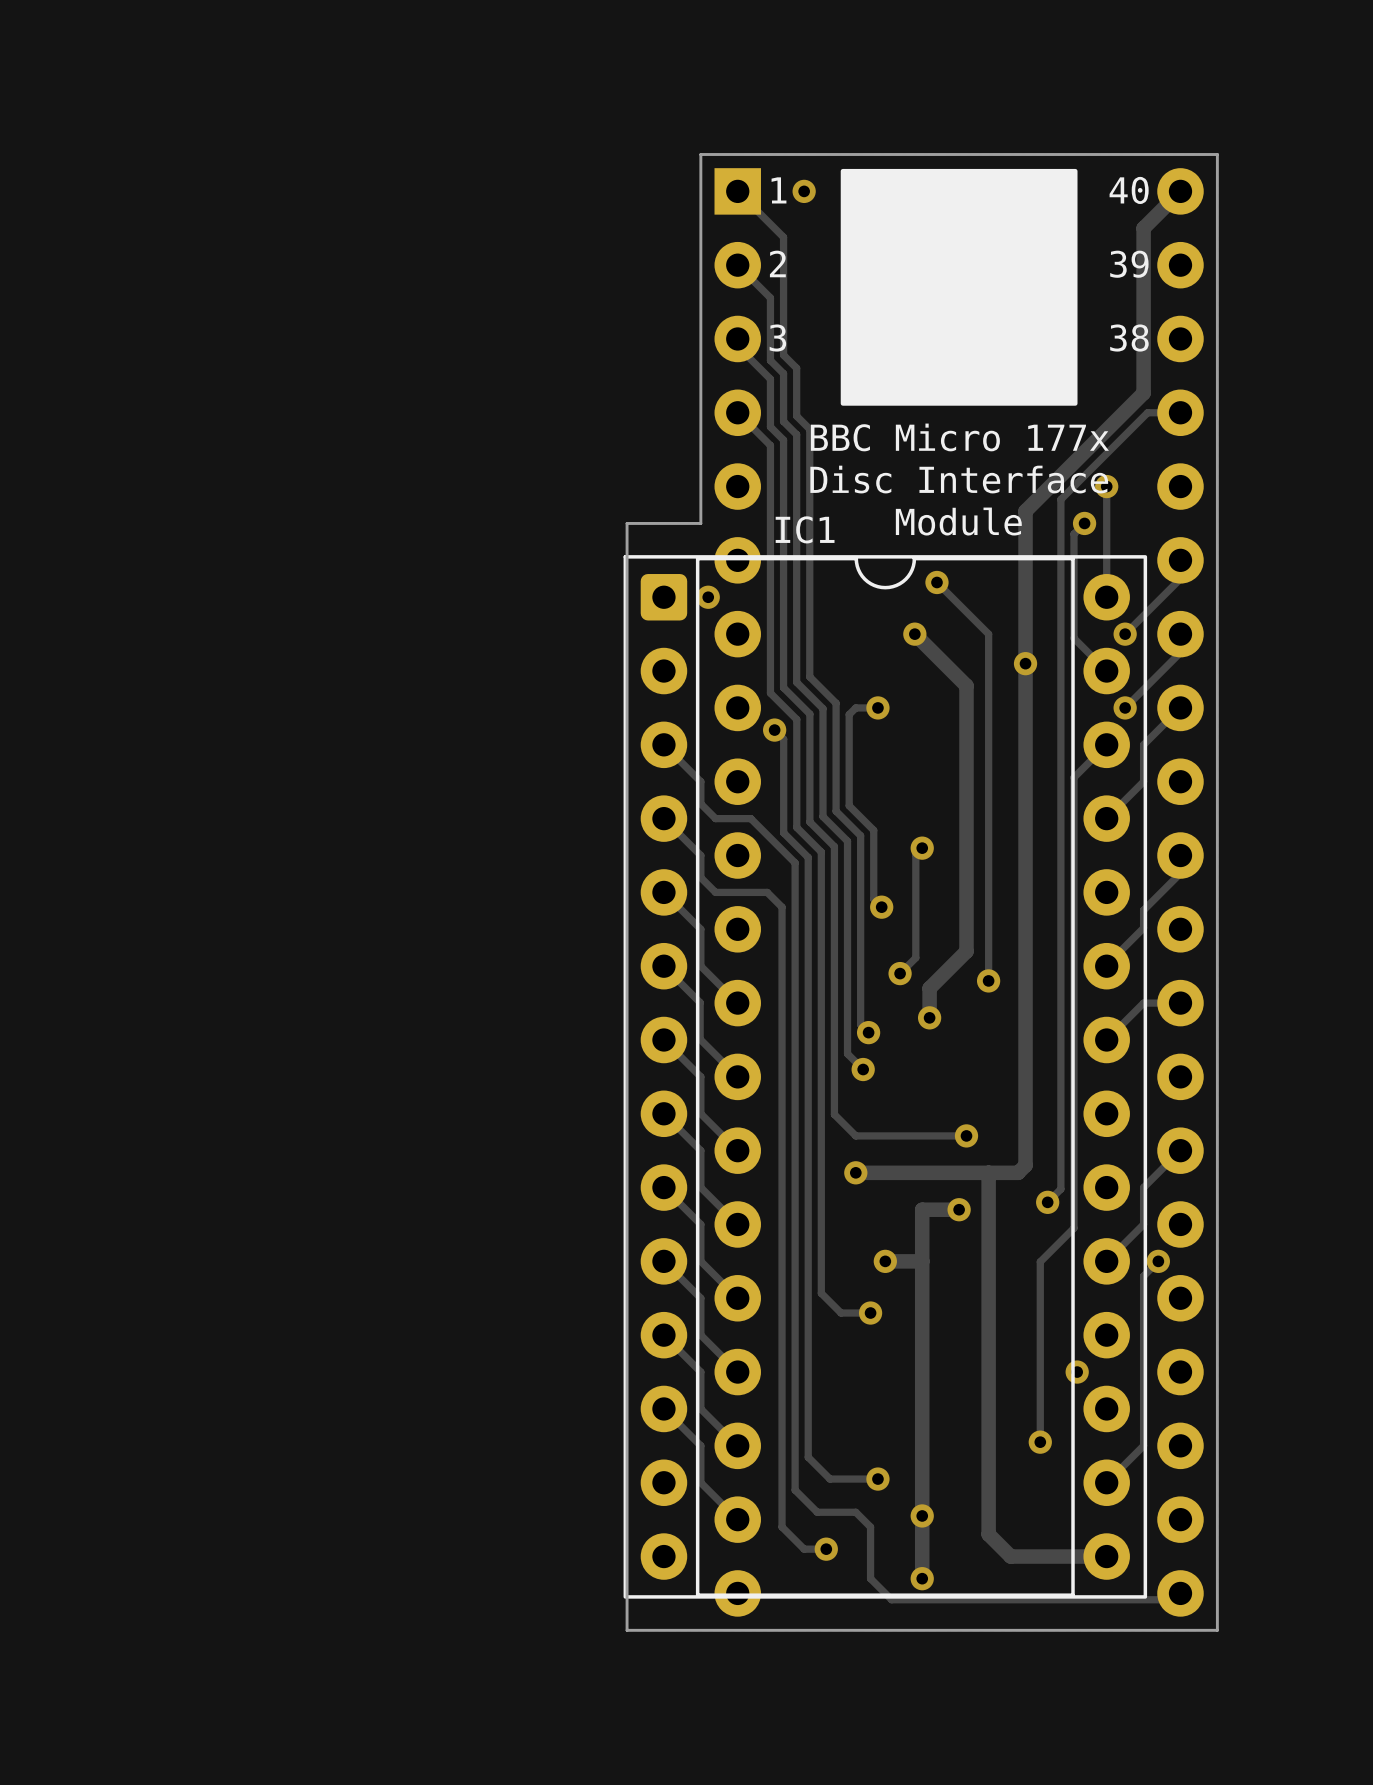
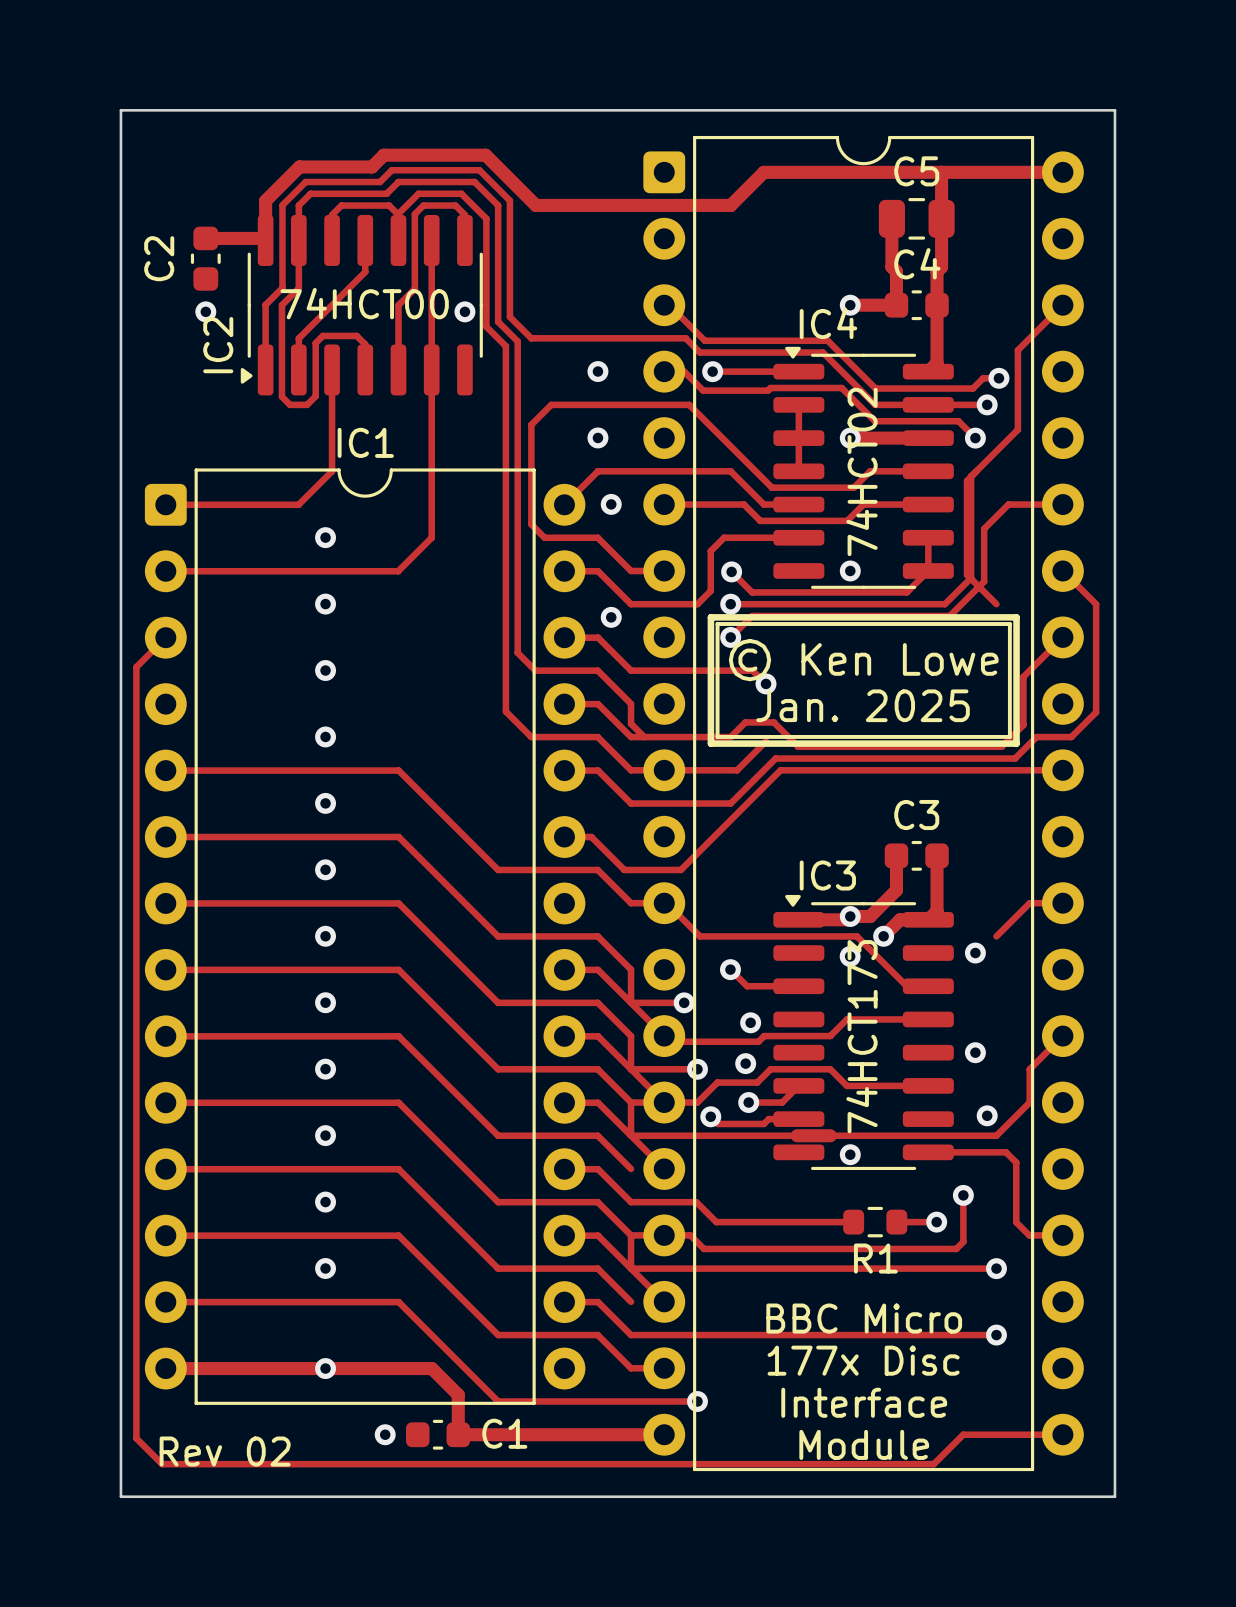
board edge: (700, 154) (700, 523) (627, 523) (627, 1630) (1217, 1630) (1217, 154) (700, 154) -> (120, 110) (120, 1496) (1114, 1496) (1114, 110) (120, 110)
drawing: [840, 168, 1078, 406] -> none
text: 1 (778, 190) -> none
text: 40 (1129, 190) -> none
track: (737, 191) (783, 237) (783, 355) (796, 368) (796, 416) (809, 429) -> none
via: (804, 191) -> none
track: none -> (941, 172) (941, 267) (937, 271) (937, 362) (928, 371)
track: (1180, 191) (1143, 228) (1143, 393) (1025, 511) (1025, 1165) (1018, 1172) (855, 1172) -> (1062, 172) (763, 172) (730, 205) (535, 205) (485, 155) (383, 155) (372, 166) (299, 166) (265, 200) (265, 240)
track: none -> (398, 214) (389, 205) (341, 205) (332, 214) (332, 240)
track: none -> (891, 218) (891, 267) (896, 271) (896, 305) (850, 305)
C5: none -> (916, 218)
text: 2 (777, 263) -> none
track: none -> (205, 238) (263, 238)
text: 39 (1129, 264) -> none
track: (737, 265) (770, 297) (770, 360) (783, 373) (783, 421) (796, 434) (796, 682) (822, 708) (822, 816) (847, 841) (847, 1053) (863, 1069) -> none
track: none -> (365, 240) (365, 271) (298, 338) (298, 369)
track: none -> (398, 240) (398, 213) (418, 193) (461, 193) (486, 218) (486, 326) (505, 346) (505, 711) (531, 737) (597, 737)
track: none -> (431, 240) (431, 537) (398, 571) (165, 571)
track: none -> (464, 240) (464, 214) (455, 205) (423, 205) (414, 214) (414, 288) (398, 305) (398, 369)
C2: none -> (205, 258)
IC2: none -> 74HCT00 (361, 305)
track: none -> (669, 305) (704, 340) (827, 340) (875, 388) (972, 388) (983, 378) (998, 378)
text: 3 (777, 338) -> none
via: none -> (850, 305)
C4: none -> (916, 305)
text: 38 (1129, 338) -> none
track: none -> (1062, 305) (1017, 350) (1017, 429) (971, 476) (971, 578) (944, 604) (730, 604)
via: none -> (205, 311)
via: none -> (464, 311)
track: (737, 346) (770, 379) (770, 426) (783, 440) (783, 687) (809, 714) (809, 822) (834, 846) (834, 1114) (855, 1135) (966, 1135) -> none
track: none -> (265, 369) (265, 304) (282, 288) (282, 205) (305, 182) (380, 182) (391, 170) (479, 170) (509, 200) (509, 316) (531, 338) (685, 338) (699, 352) (822, 352) (875, 404) (987, 404)
track: none -> (332, 369) (332, 471) (298, 504) (165, 504)
track: none -> (365, 369) (365, 344) (356, 335) (322, 335) (315, 343) (315, 396) (307, 404) (290, 404) (281, 396) (281, 305) (298, 288) (298, 205) (310, 193) (386, 193) (398, 182) (474, 182) (498, 205) (498, 321) (517, 341) (517, 652) (535, 670) (597, 670)
via: none -> (597, 371)
track: (737, 412) (770, 445) (770, 693) (796, 719) (796, 827) (821, 852) (821, 1293) (841, 1313) (870, 1313) -> (664, 371) (684, 371) (703, 390) (841, 388) (874, 421) (958, 421) (975, 438)
track: none -> (712, 371) (798, 371)
via: none -> (712, 371)
track: (1180, 412) (1147, 412) (1060, 499) (1060, 1189) (1047, 1202) -> none
via: none -> (998, 378)
track: (809, 429) (809, 676) (836, 703) (836, 811) (860, 835) (860, 1024) (868, 1032) -> none
text: BBC Micro 177x (959, 437) -> none
track: none -> (798, 404) (798, 471)
via: none -> (987, 404)
text: Disc Interface (959, 479) -> none
via: none -> (597, 437)
track: none -> (850, 438) (928, 438)
via: none -> (850, 438)
via: none -> (975, 438)
track: (1106, 486) (1106, 597) -> none
via: (1106, 486) -> none
IC4: none -> 74HCT02 (863, 467)
text: Module (958, 521) -> none
track: none -> (928, 471) (870, 471) (853, 487) (772, 487) (689, 404) (551, 404) (531, 424) (531, 524) (544, 537) (597, 537) (631, 570) (664, 570)
via: (1084, 523) -> none
IC1 name position: IC1 (805, 529) -> IC1 (365, 442)
IC1 footprint: [623, 555, 1148, 1599] -> [144, 468, 586, 1405]
via: none -> (611, 504)
track: none -> (664, 504) (743, 504) (760, 520) (847, 520) (863, 504) (928, 504)
track: none -> (798, 504) (763, 504) (730, 471) (597, 471) (564, 504)
track: none -> (1062, 504) (1008, 504) (984, 528) (984, 581) (949, 615) (752, 615) (730, 637)
track: (1180, 578) (1125, 634) -> none
track: (936, 582) (988, 634) (988, 988) -> none
via: (936, 582) -> none
via: none -> (325, 537)
via: (708, 597) -> none
track: none -> (798, 537) (724, 537) (710, 551) (710, 590) (697, 604) (631, 604) (598, 571) (564, 571)
track: none -> (928, 537) (928, 570) (906, 592) (752, 592) (731, 571)
track: (914, 634) (966, 685) (966, 951) (929, 988) (929, 1017) -> none
via: (914, 634) -> none
via: none -> (850, 570)
via: (1125, 634) -> none
via: none -> (731, 571)
track: (1180, 652) (1125, 707) -> none
via: (1025, 663) -> none
via: none -> (325, 604)
via: none -> (730, 604)
via: none -> (611, 617)
line: none -> (710, 617) (1016, 617) (1016, 743) (710, 743) (710, 617)
line: none -> (717, 624) (1009, 624) (1009, 736) (717, 736) (717, 624)
via: none -> (730, 637)
track: (877, 707) (855, 707) (849, 714) (849, 805) (873, 830) (873, 899) (881, 907) -> none
via: (877, 707) -> none
via: (1125, 707) -> none
track: none -> (165, 637) (136, 667) (136, 1438) (162, 1464) (933, 1464) (963, 1434) (1062, 1434)
track: none -> (564, 637) (598, 637) (631, 670) (752, 670) (766, 683)
track: (774, 730) (783, 739) (783, 832) (808, 857) (808, 1457) (829, 1479) (877, 1479) -> none
via: (774, 730) -> none
text: none -> © Ken Lowe (863, 660)
via: none -> (325, 670)
track: (1106, 744) (1073, 777) (1073, 1228) (1040, 1261) (1040, 1442) -> none
track: (1143, 744) (1143, 781) (1106, 818) -> (1029, 670) (1023, 676) (1023, 725) (1001, 746) (798, 746) (773, 722) (745, 722) (730, 737) (676, 737)
via: none -> (766, 683)
track: none -> (564, 704) (598, 704) (631, 737) (644, 737)
text: none -> Jan. 2025 (863, 705)
via: none -> (325, 736)
track: (750, 818) (795, 862) (795, 1490) (817, 1512) (855, 1512) (870, 1527) (870, 1578) (891, 1599) (1174, 1599) -> none
track: none -> (766, 741) (737, 770) (631, 770)
track: (922, 848) (915, 854) (915, 957) (900, 973) -> none
via: (922, 848) -> none
track: (700, 855) (700, 877) (715, 892) -> (564, 770) (598, 770) (631, 803) (644, 803)
track: none -> (1062, 770) (780, 770) (680, 869) (624, 869) (591, 837) (564, 837)
track: (1180, 873) (1143, 910) (1143, 928) (1105, 965) -> none
via: none -> (325, 803)
track: (663, 892) (700, 929) (700, 966) (737, 1003) -> (165, 770) (398, 770) (498, 869) (597, 869) (631, 903) (664, 903)
part: (737, 892) -> none
track: (767, 892) (782, 907) (782, 1527) (804, 1549) (826, 1549) -> (690, 803) (730, 803) (775, 758) (1015, 758) (1036, 737) (1071, 737) (1096, 712) (1096, 604) (1062, 570)
part: none -> (863, 803)
part: (1180, 892) -> none
via: (881, 907) -> none
track: none -> (165, 837) (398, 837) (498, 936) (597, 936)
track: none -> (896, 855) (896, 890) (870, 916) (850, 916) (846, 919) (798, 919)
C3: none -> (916, 855)
track: none -> (937, 855) (937, 911) (928, 919) (900, 919) (883, 936)
track: (663, 965) (700, 1002) (700, 1039) (737, 1076) -> none
via: none -> (325, 869)
via: (900, 973) -> none
via: (988, 980) -> none
track: none -> (165, 903) (398, 903) (498, 1002) (597, 1002)
track: none -> (666, 903) (700, 936) (856, 936) (906, 986)
via position: (929, 1017) -> (850, 916)
via: (868, 1032) -> none
via: none -> (325, 936)
via: none -> (883, 936)
via: none -> (975, 953)
via: none -> (850, 956)
via: (863, 1069) -> none
track: none -> (730, 969) (747, 986) (798, 986)
via: none -> (730, 969)
track: none -> (165, 969) (398, 969) (498, 1069) (597, 1069)
track: none -> (564, 969) (598, 969) (631, 1002) (684, 1002)
via: none -> (325, 1002)
via: none -> (684, 1002)
track: none -> (928, 1019) (846, 1019) (830, 1036) (764, 1036) (758, 1041) (669, 1041)
via: none -> (750, 1022)
via: (966, 1135) -> none
IC3: none -> 74HCT173 (863, 1032)
track: none -> (165, 1036) (398, 1036) (498, 1135) (597, 1135)
track: none -> (564, 1036) (598, 1036) (631, 1069) (697, 1069)
via: none -> (975, 1052)
via: (855, 1172) -> none
track: (988, 1172) (988, 1534) (1010, 1556) (1106, 1556) -> none
via: none -> (745, 1063)
via: none -> (325, 1069)
via: none -> (697, 1069)
via: (1047, 1202) -> none
track: none -> (798, 1085) (782, 1102) (748, 1102)
track: none -> (928, 1085) (846, 1085) (830, 1069) (770, 1069) (757, 1082) (717, 1082) (697, 1102) (631, 1102)
track: (959, 1209) (922, 1209) (922, 1578) -> none
via: (959, 1209) -> none
track: none -> (165, 1102) (398, 1102) (498, 1202) (597, 1202)
track: none -> (564, 1102) (598, 1102) (631, 1135) (797, 1135)
via: none -> (748, 1102)
via: none -> (987, 1115)
track: none -> (710, 1116) (717, 1123) (763, 1123) (768, 1119) (798, 1119)
via: none -> (710, 1116)
via: none -> (325, 1135)
via: (885, 1261) -> none
track: none -> (830, 1135) (996, 1135)
track: (1158, 1261) (1143, 1276) (1143, 1445) (1106, 1482) -> (564, 1302) (598, 1302) (631, 1335) (996, 1335)
via: (1158, 1261) -> none
track: none -> (928, 1152) (1006, 1152) (1016, 1162) (1016, 1222) (1029, 1235) (1062, 1235)
via: none -> (850, 1154)
track: none -> (165, 1169) (398, 1169) (498, 1268) (597, 1268)
track: none -> (564, 1169) (598, 1169) (631, 1202) (696, 1202) (716, 1222) (853, 1222)
track: (700, 1298) (700, 1335) (737, 1372) -> none
via: (870, 1313) -> none
track: none -> (963, 1195) (963, 1241) (956, 1248) (704, 1248) (690, 1235) (631, 1235)
via: none -> (963, 1195)
via: none -> (325, 1202)
R1: none -> (875, 1222)
track: none -> (896, 1222) (936, 1222)
via: none -> (936, 1222)
track: none -> (564, 1235) (598, 1235) (631, 1268) (996, 1268)
via: (1077, 1372) -> none
via: none -> (325, 1268)
via: none -> (996, 1268)
via: (1040, 1442) -> none
track: (700, 1445) (700, 1482) (737, 1519) -> (165, 1235) (398, 1235) (498, 1335) (597, 1335) (631, 1368) (664, 1368)
track: none -> (165, 1302) (398, 1302) (498, 1401) (697, 1401)
text: none -> BBC Micro (864, 1318)
via: (877, 1479) -> none
via: none -> (996, 1335)
text: none -> 177x Disc (863, 1360)
via: (922, 1515) -> none
track: none -> (165, 1368) (431, 1368) (458, 1394) (458, 1434)
via: none -> (325, 1368)
via position: (826, 1549) -> (697, 1401)
text: none -> Interface (864, 1402)
via: (922, 1578) -> none
via: none -> (385, 1434)
C1: none -> (438, 1434)
track: none -> (464, 1434) (664, 1434)
text: none -> Module (864, 1444)
text: none -> Rev 02 (225, 1451)

